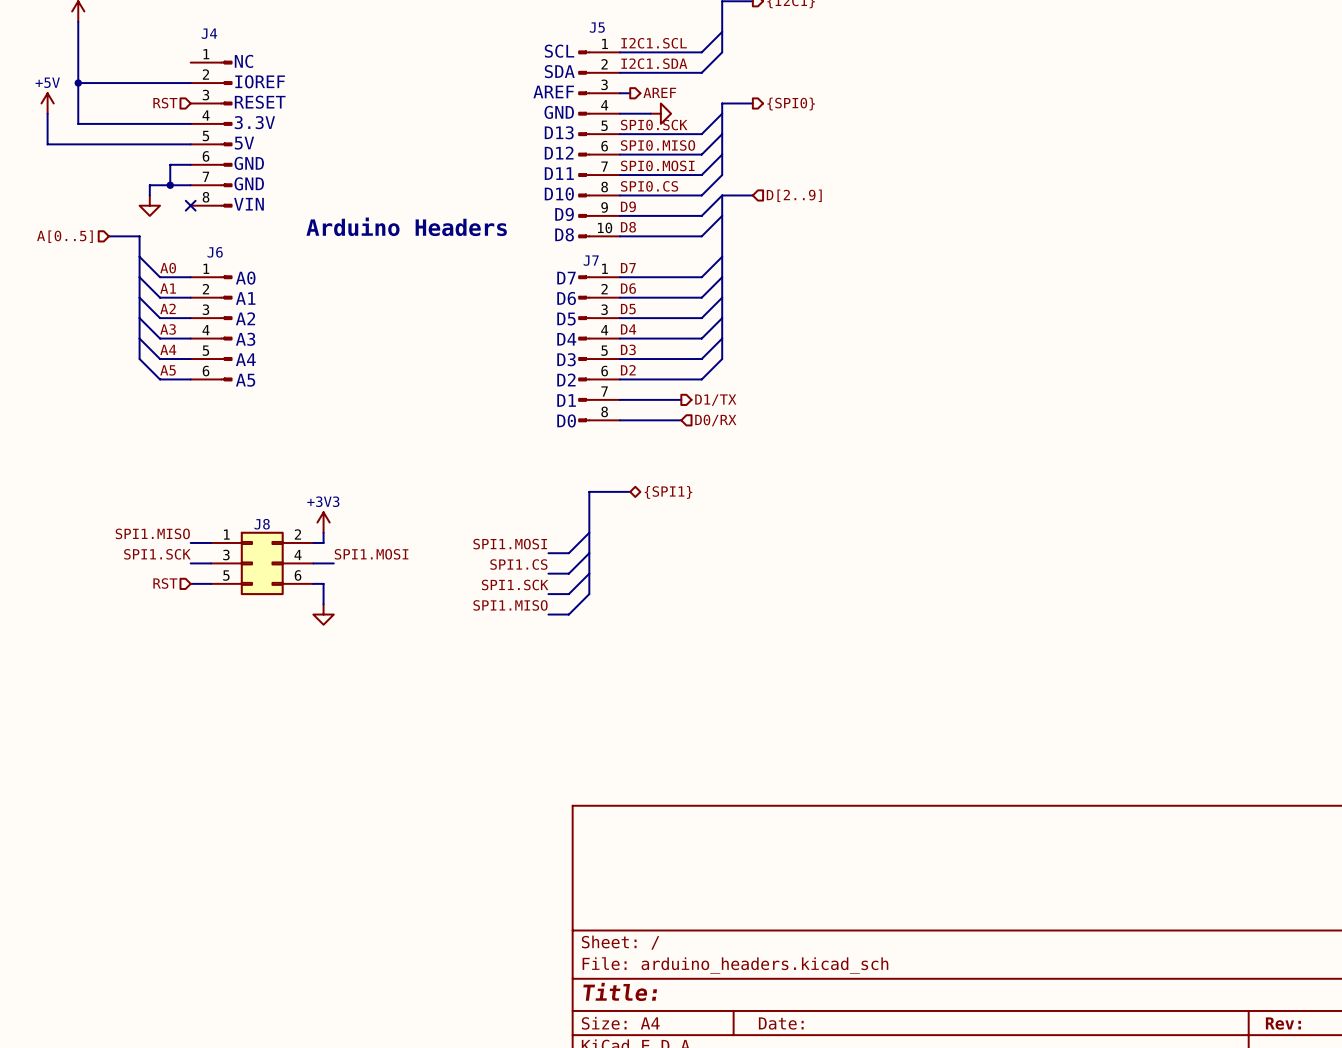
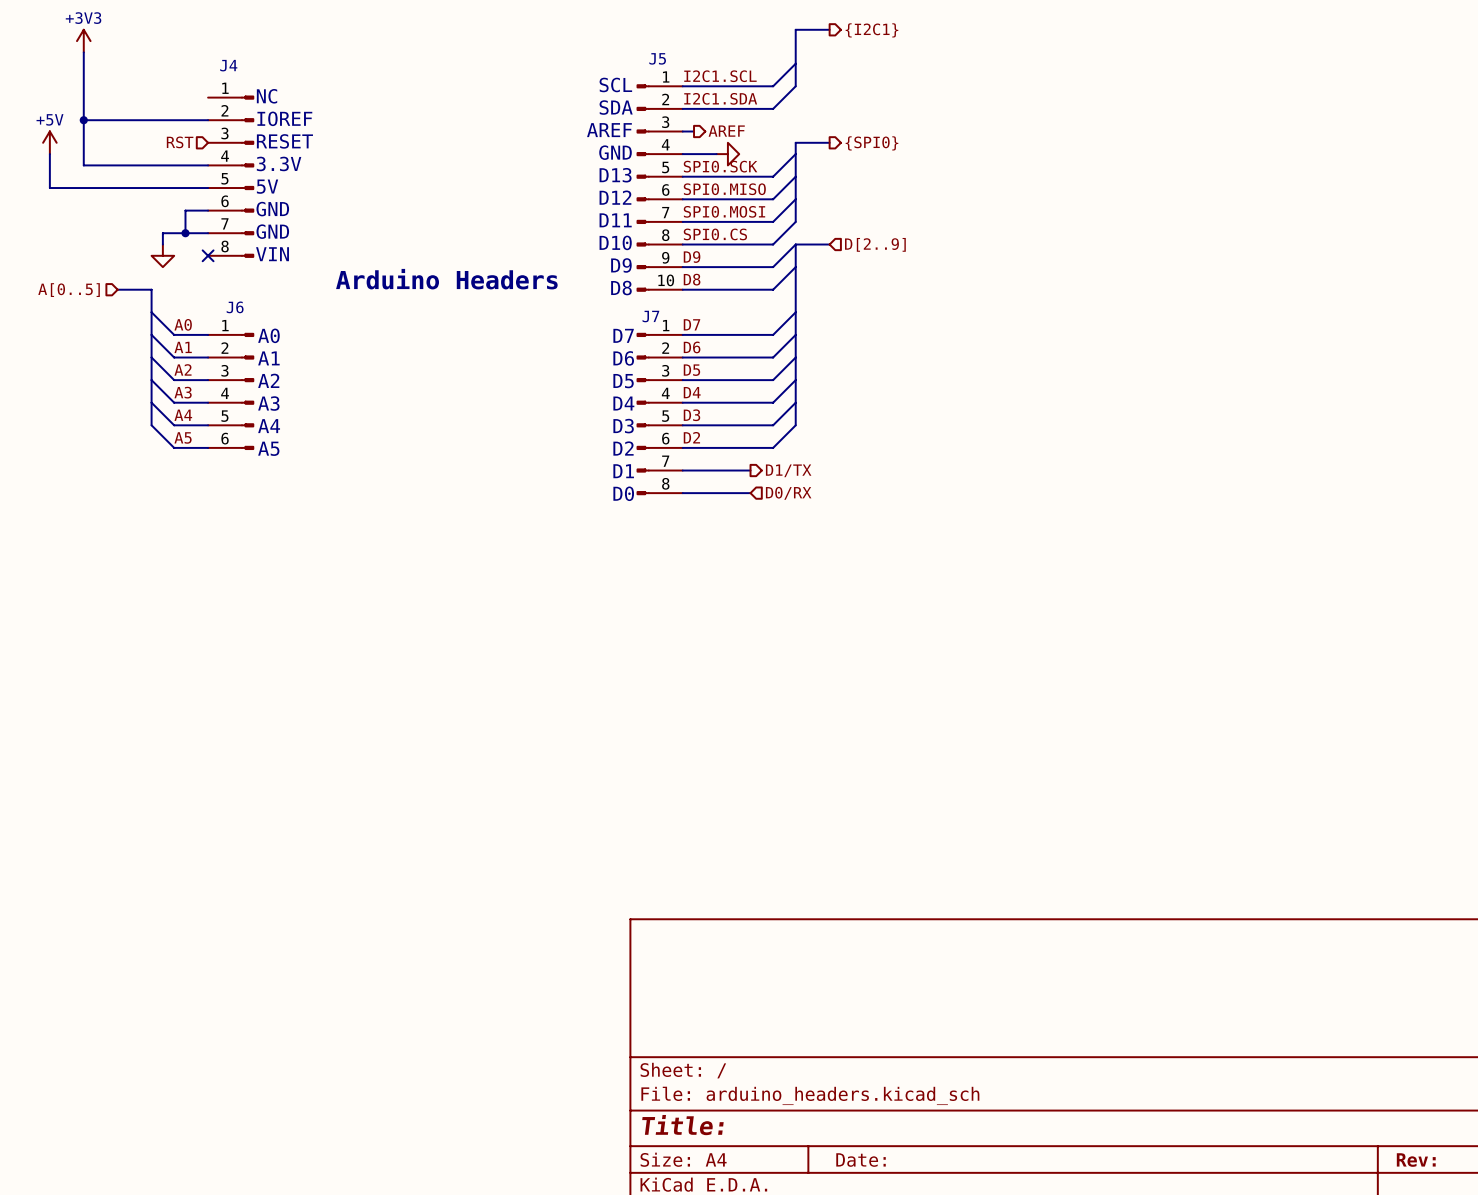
bus: (630, 491) (589, 491) (589, 594) -> none
hierarchical label: {SPI1} (668, 492) -> none
power symbol: +3V3 (323, 522) -> none
wire: (323, 532) (323, 542) (313, 542) -> none
wire: (589, 532) (568, 553) (548, 553) -> none
label: SPI1.MISO (152, 533) -> none
wire: (190, 542) (211, 542) -> none
label: SPI1.MOSI (510, 544) -> none
wire: (589, 553) (568, 573) (548, 573) -> none
label: SPI1.SCK (157, 554) -> none
label: SPI1.MOSI (371, 554) -> none
wire: (190, 563) (211, 563) -> none
J8: (262, 563) -> none
wire: (313, 563) (333, 563) -> none
label: SPI1.CS (518, 564) -> none
wire: (589, 573) (568, 594) (548, 594) -> none
hierarchical label: RST (165, 583) -> none
wire: (190, 583) (211, 583) -> none
wire: (313, 583) (323, 583) (323, 604) -> none
label: SPI1.SCK (515, 584) -> none
wire: (589, 594) (568, 614) (548, 614) -> none
label: SPI1.MISO (510, 605) -> none
power symbol: (323, 614) -> none

